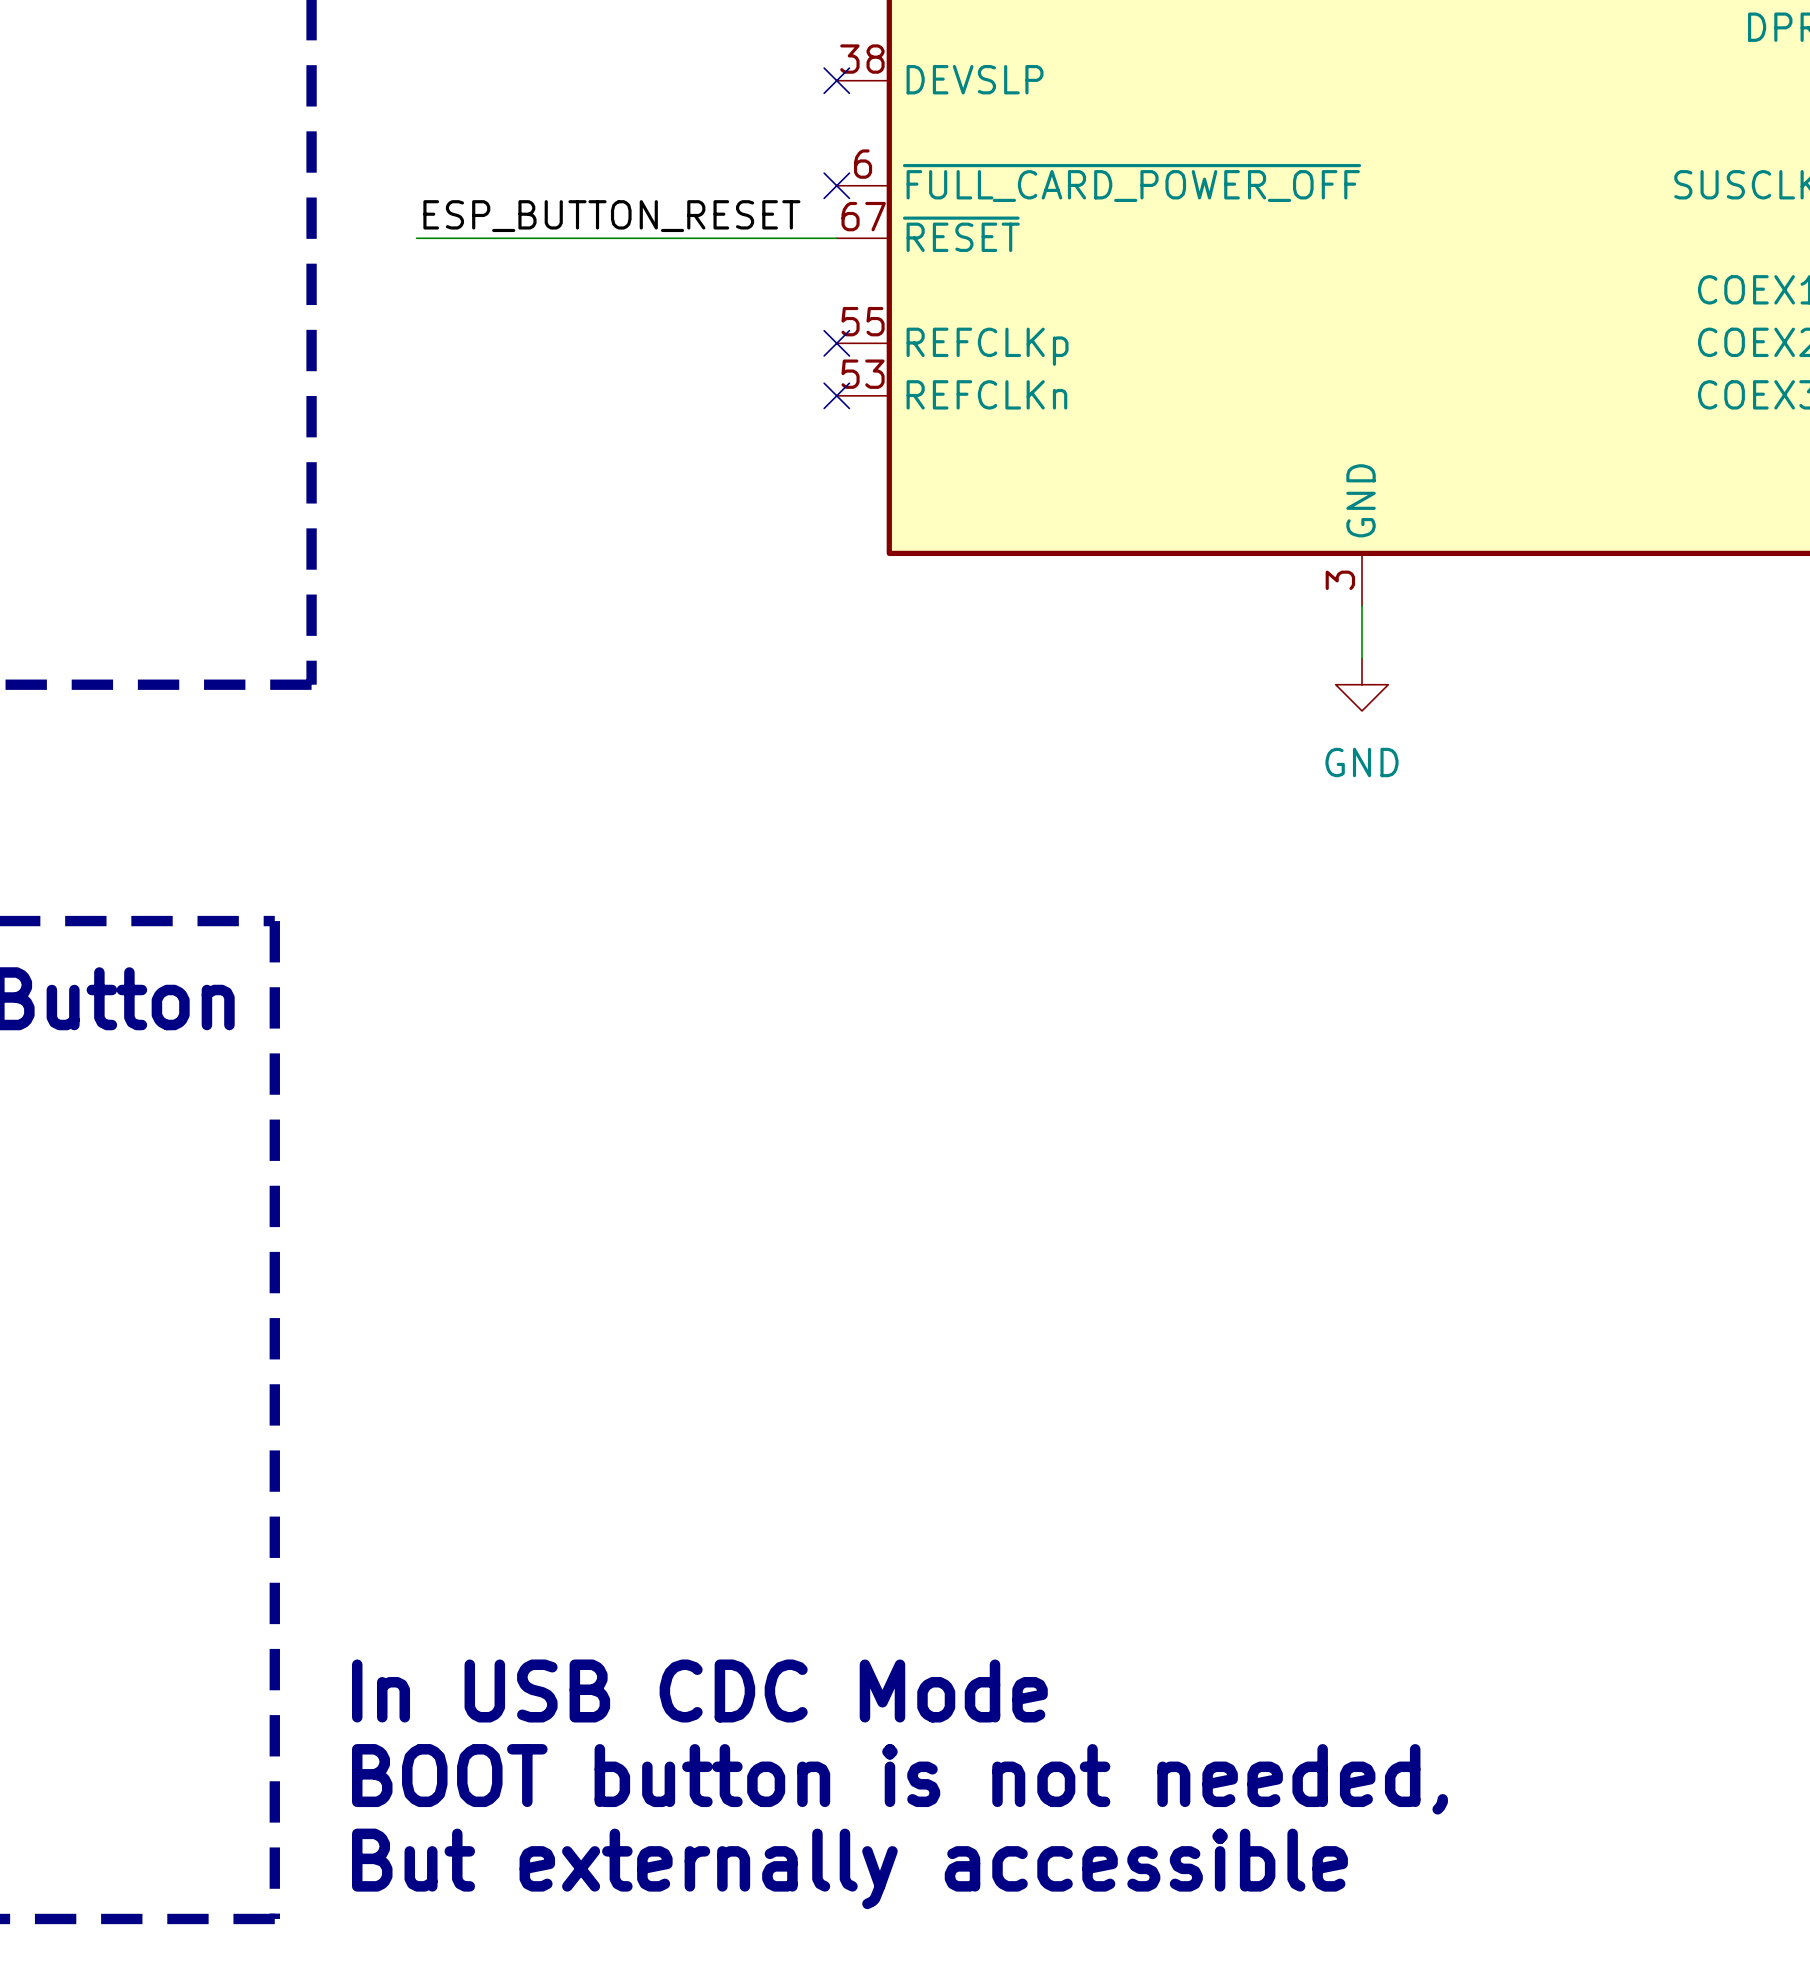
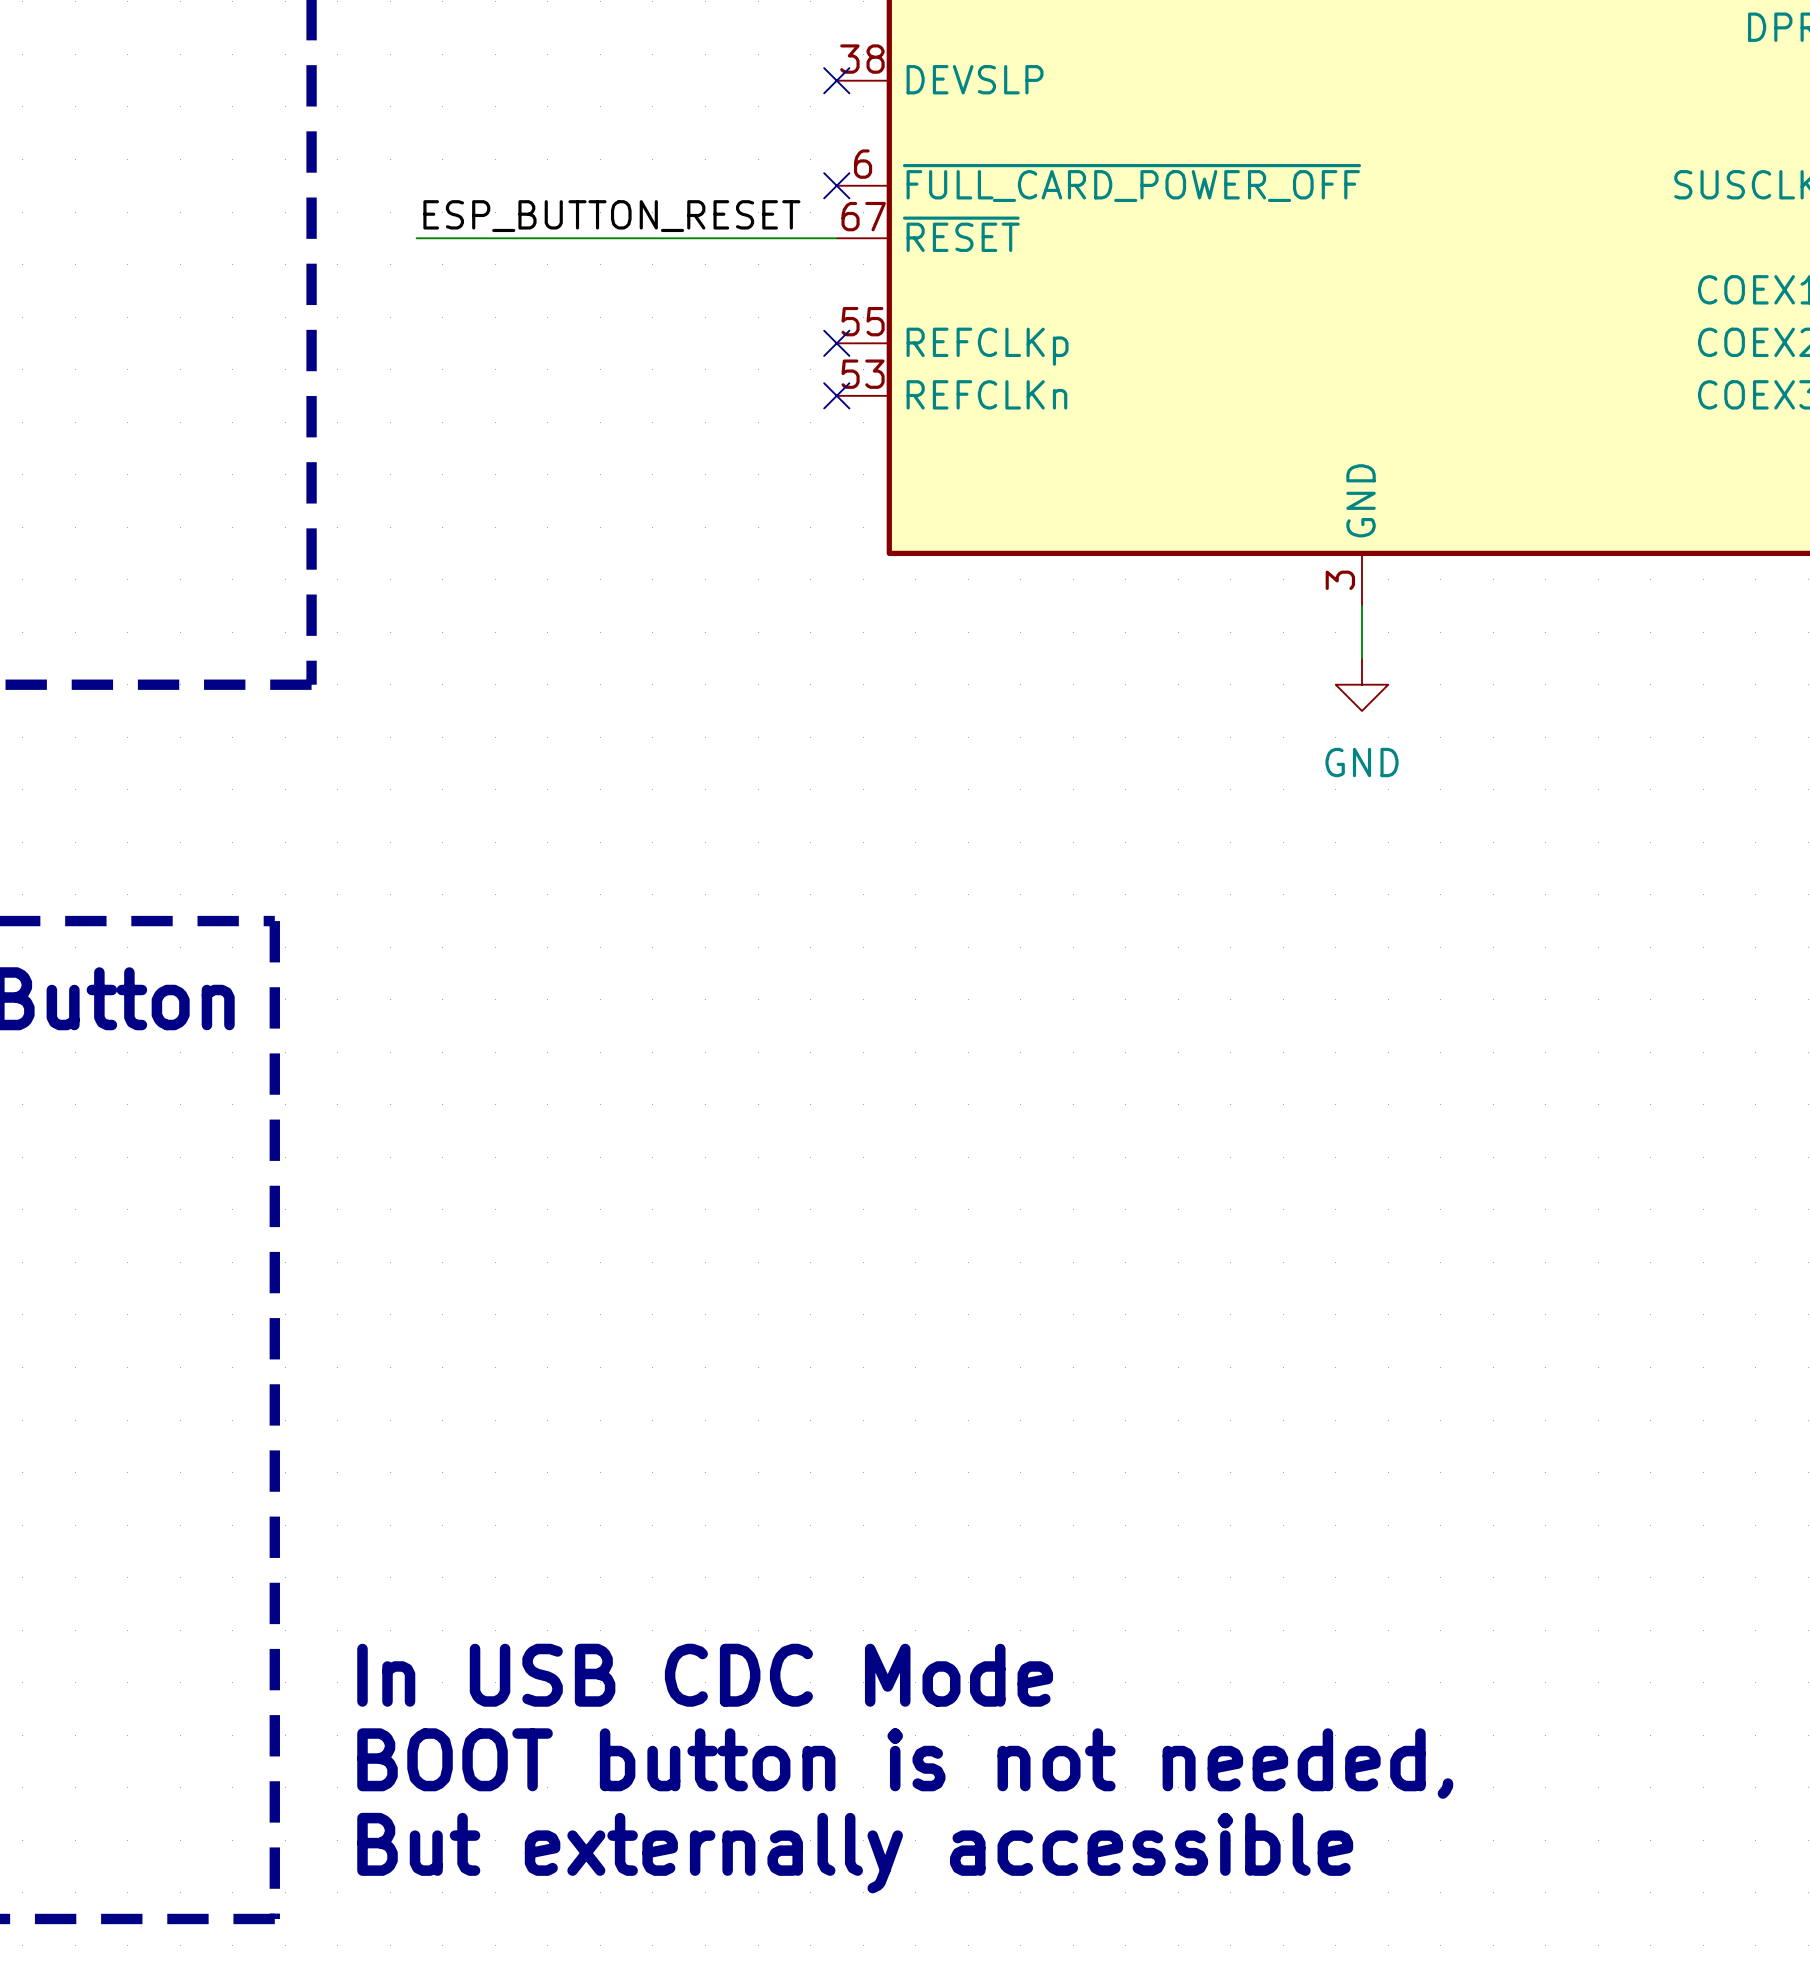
text position: In USB CDC Mode (699, 1690) -> In USB CDC Mode (705, 1675)
text position: BOOT button is not needed, (899, 1779) -> BOOT button is not needed, (905, 1763)
text position: But externally accessible (849, 1868) -> But externally accessible (855, 1853)

